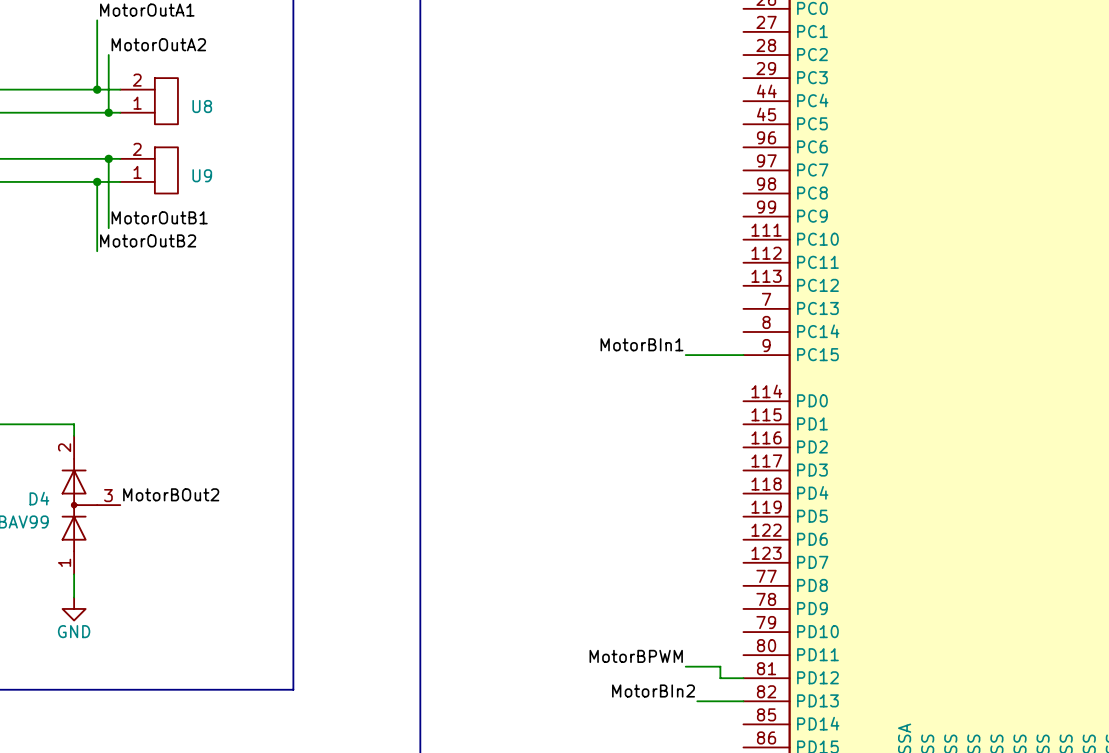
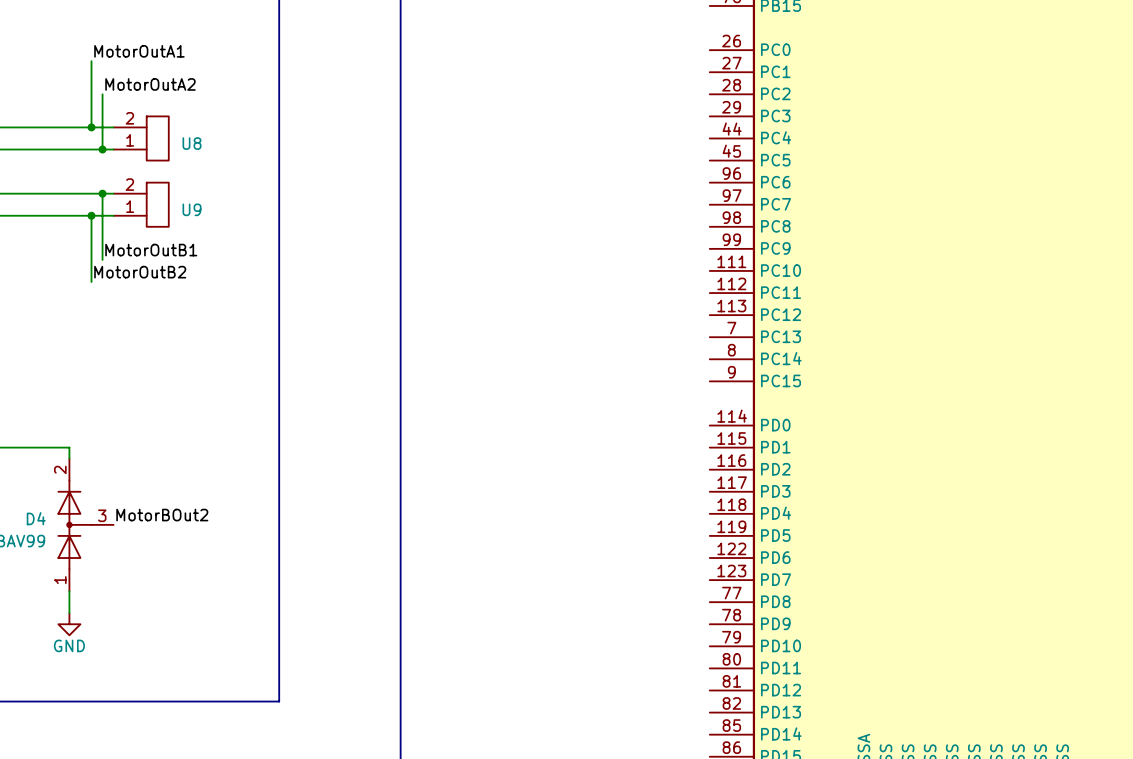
label: MotorBIn1 (641, 344) -> none
wire: (685, 355) (743, 355) -> none
label: MotorBPWM (636, 656) -> none
wire: (685, 666) (720, 666) (720, 678) (743, 678) -> none
label: MotorBIn2 (653, 691) -> none
wire: (697, 701) (743, 701) -> none

